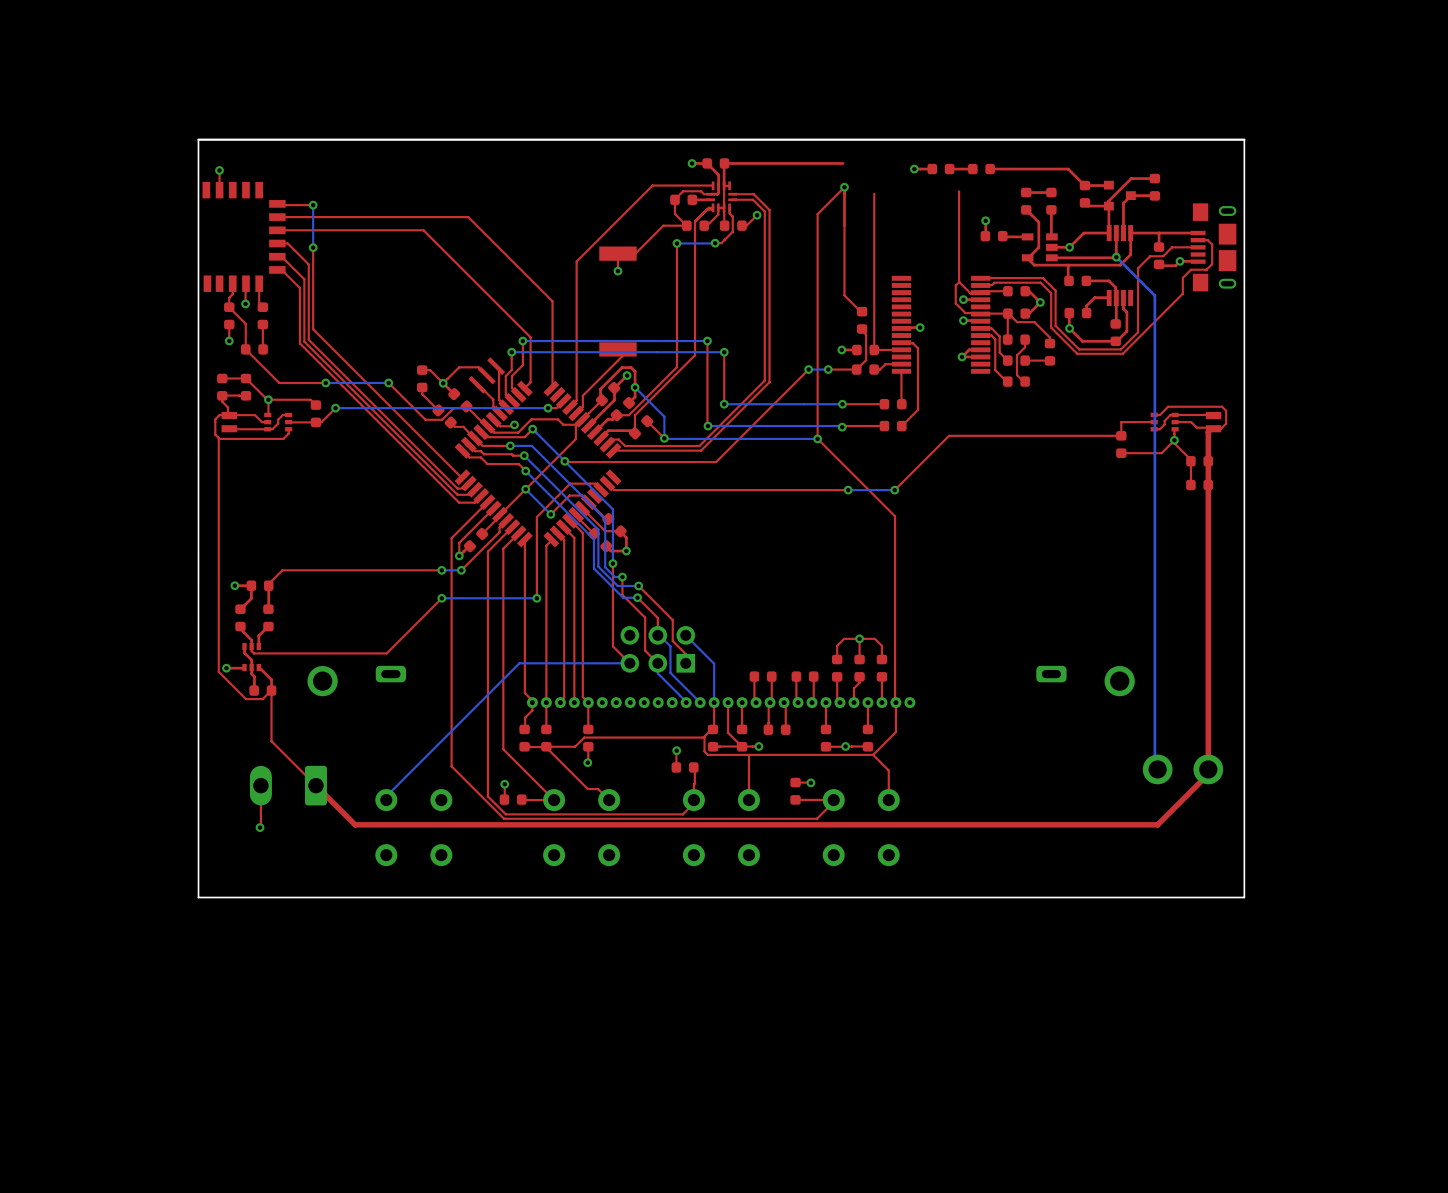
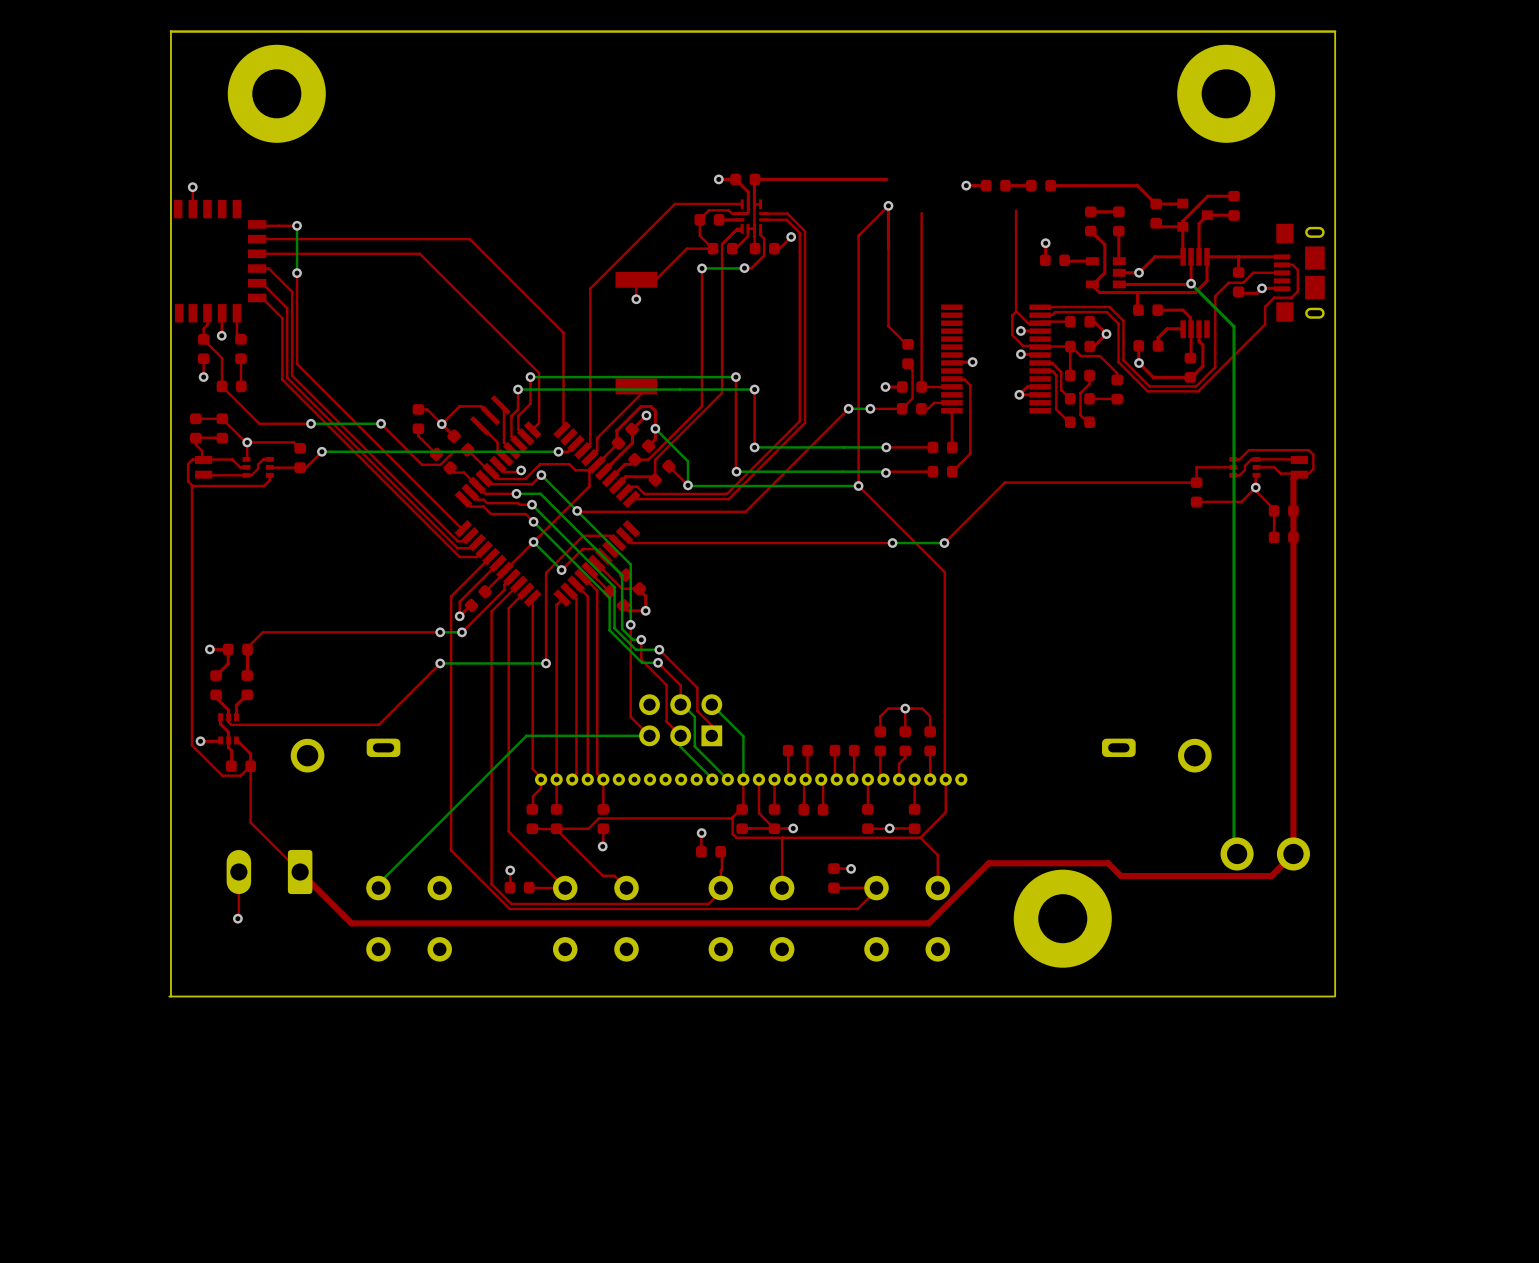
board edge: none -> (170, 30) (170, 996)
board edge: none -> (170, 31) (1335, 31) (1335, 996)
part: none -> (276, 93)
part: none -> (1226, 93)
top track: (1210, 771) (1157, 824) (355, 824) -> (1293, 853) (1271, 876) (1120, 876) (1108, 863) (988, 863) (928, 923) (351, 923) (343, 915)
part: none -> (1062, 918)
board edge: (1244, 897) (1244, 139) (198, 139) (198, 897) -> none

